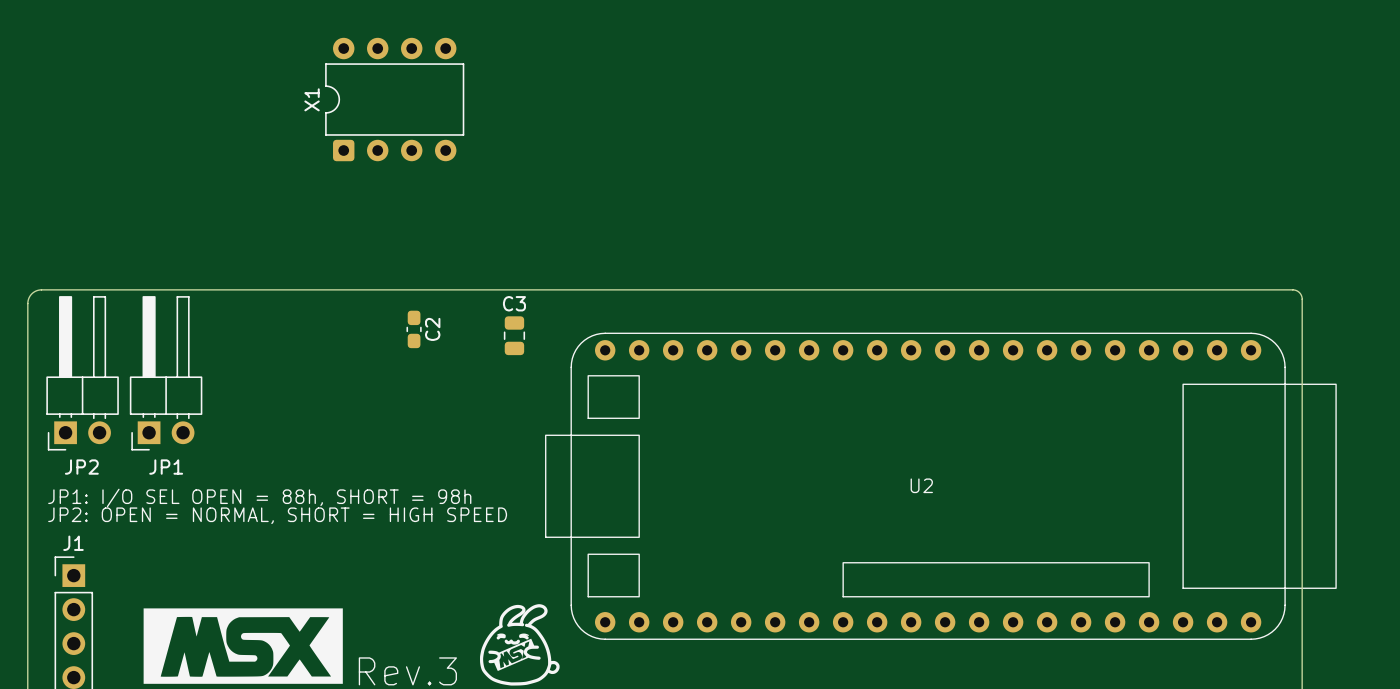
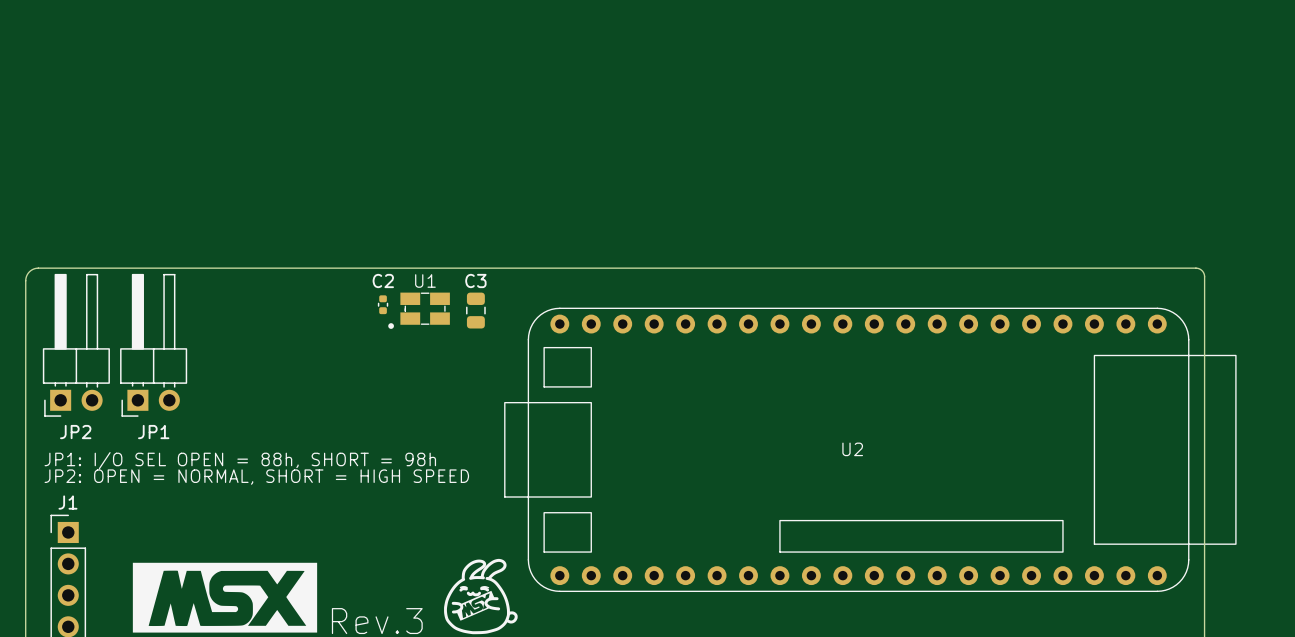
X1: (394, 99) -> none
C2 footprint: [406, 310, 422, 349] -> [377, 295, 389, 315]
C2 name rotation: 0° (432, 329) -> 90° clockwise (383, 280)
U1: none -> (419, 310)

